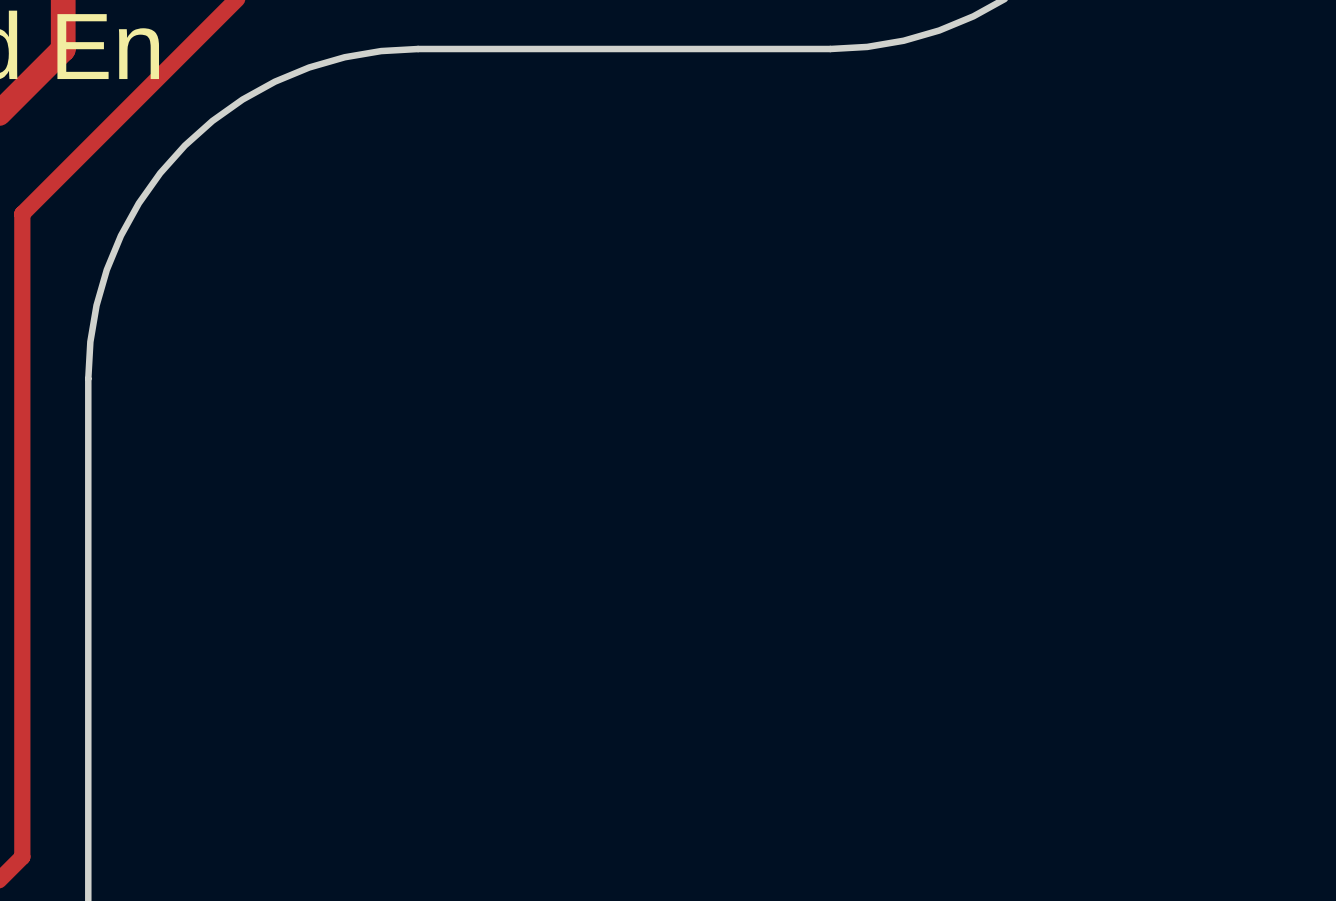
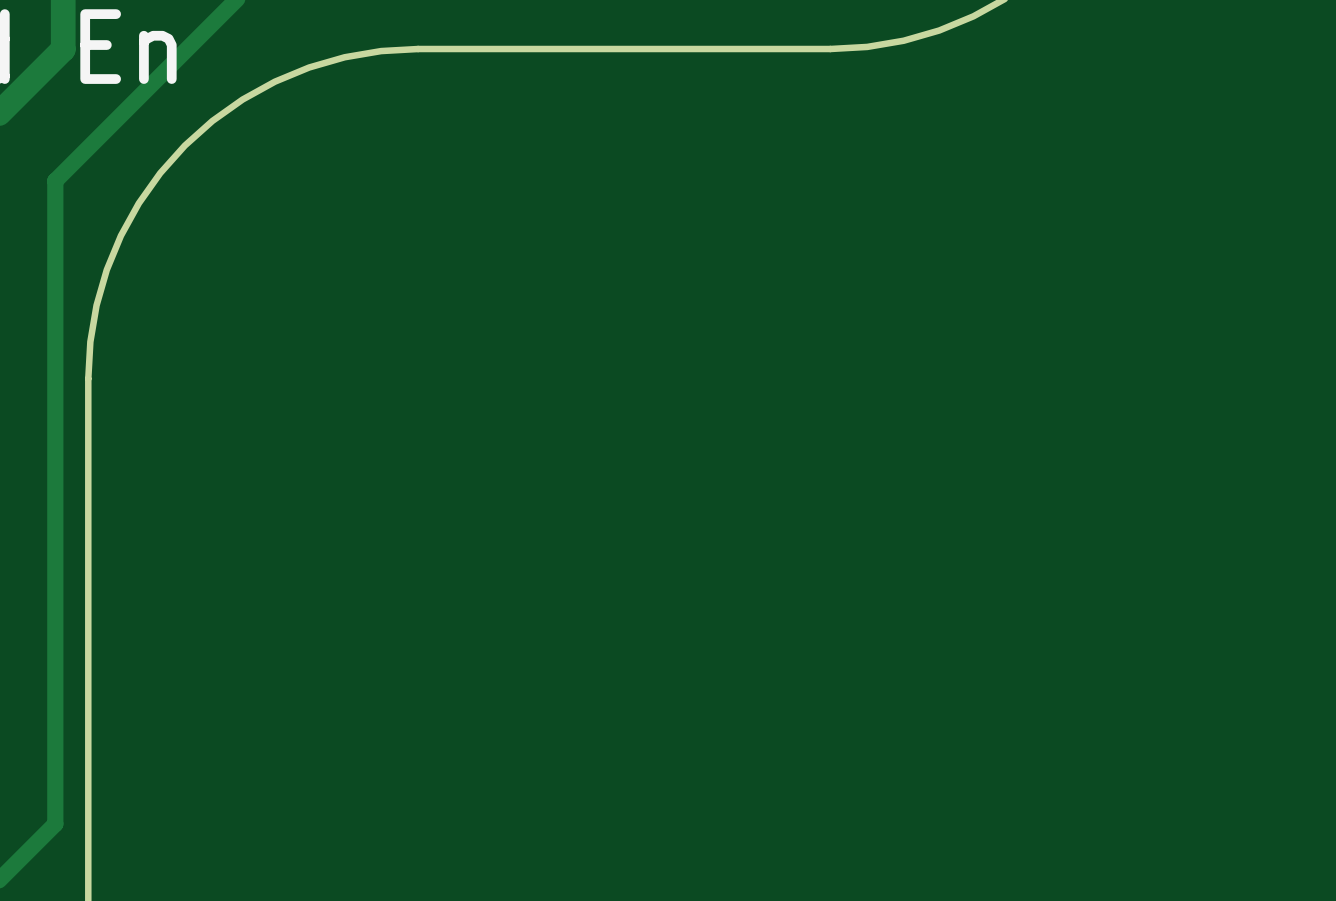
track: (55, 180) (22, 213) (22, 857) -> (55, 180) (55, 824) (22, 857)

